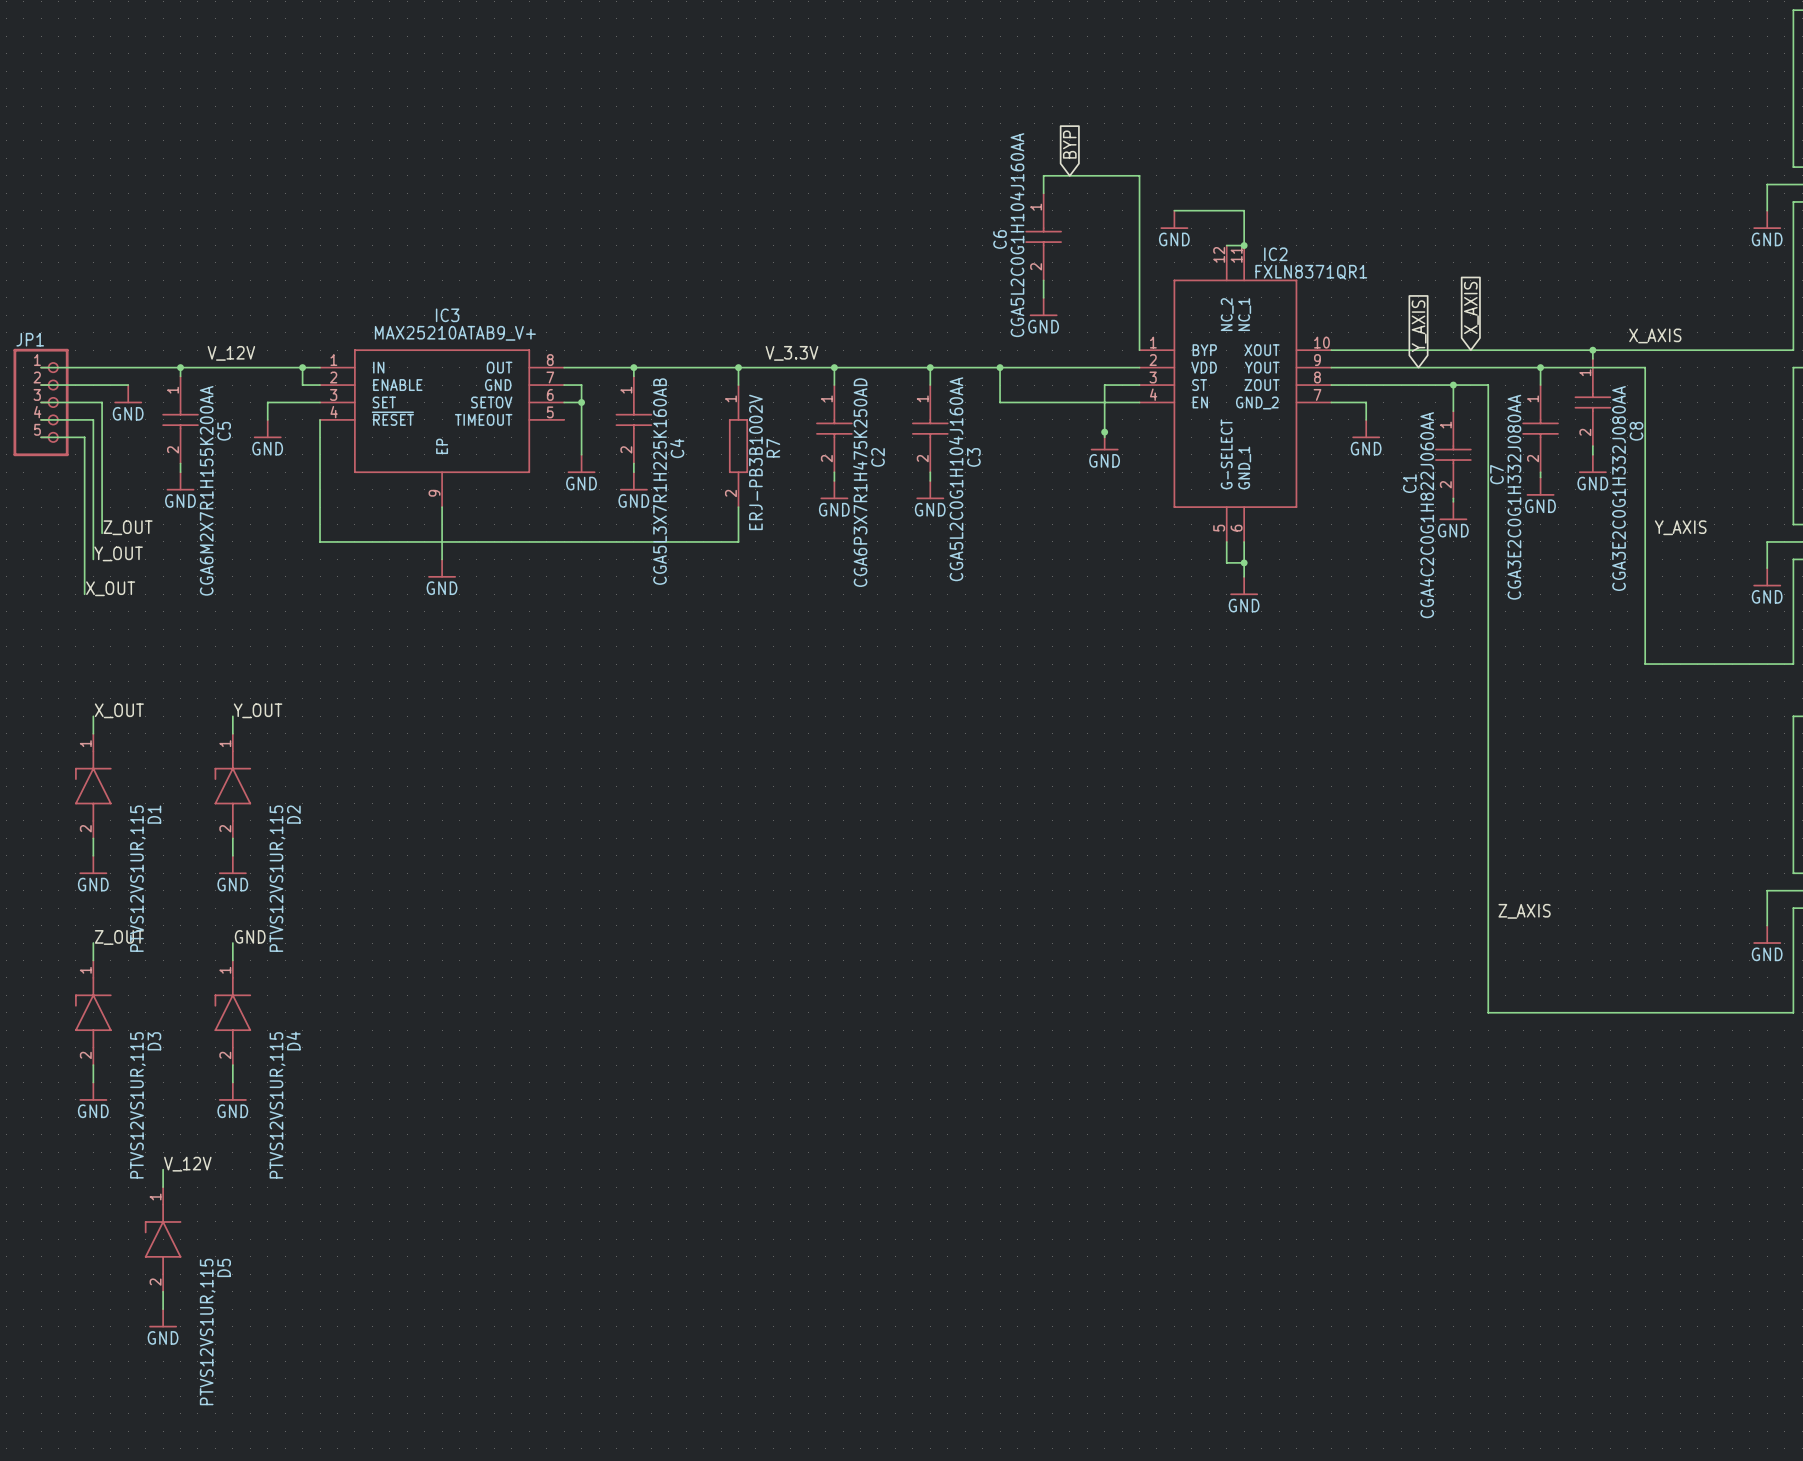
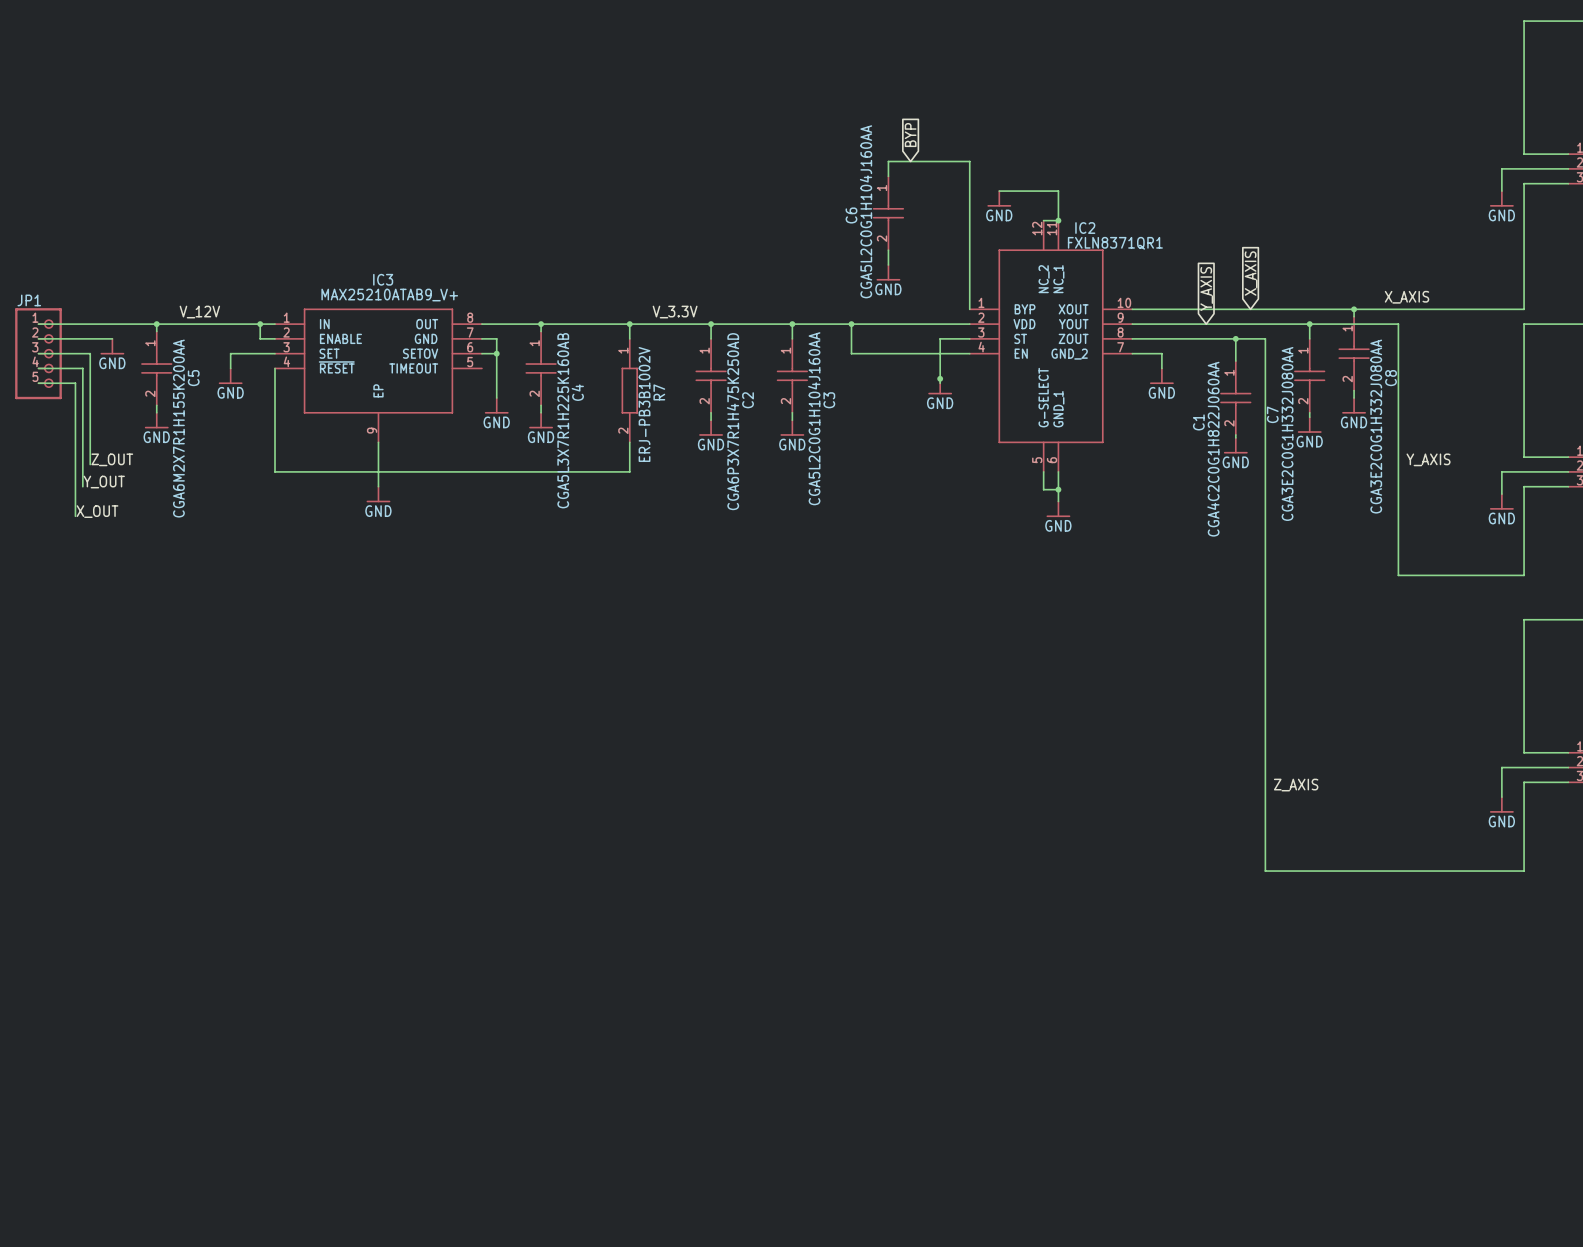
label: X_OUT (119, 710) -> none
label: Y_OUT (258, 710) -> none
wire: (93, 716) (93, 733) -> none
wire: (232, 716) (232, 733) -> none
D1: PTVS12VS1UR,115 (93, 786) -> none
D2: PTVS12VS1UR,115 (232, 786) -> none
wire: (93, 838) (93, 855) -> none
wire: (232, 838) (232, 855) -> none
power symbol: GND (93, 864) -> none
power symbol: GND (232, 864) -> none
label: GND (250, 936) -> none
label: Z_OUT (119, 937) -> none
wire: (93, 943) (93, 960) -> none
wire: (232, 943) (232, 960) -> none
D3: PTVS12VS1UR,115 (93, 1012) -> none
D4: PTVS12VS1UR,115 (232, 1012) -> none
wire: (93, 1065) (93, 1082) -> none
wire: (232, 1065) (232, 1082) -> none
power symbol: GND (93, 1091) -> none
power symbol: GND (232, 1091) -> none
label: V_12V (187, 1164) -> none
wire: (163, 1169) (163, 1187) -> none
D5: PTVS12VS1UR,115 (163, 1239) -> none
wire: (163, 1291) (163, 1309) -> none
power symbol: GND (163, 1318) -> none

